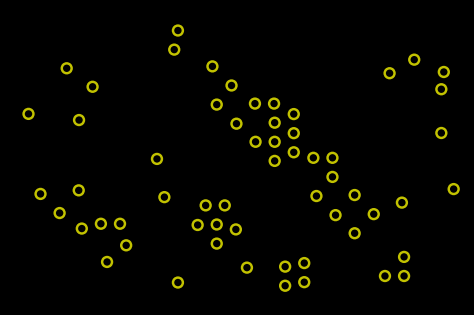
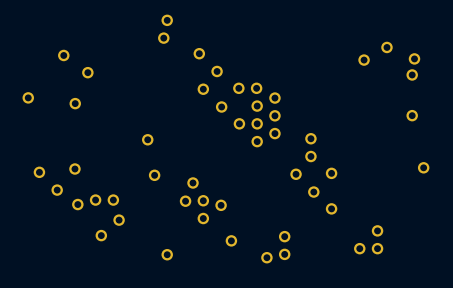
part: (313, 157) -> none
part: (401, 202) -> none
part: (224, 205) -> none
part: (373, 214) -> none
part: (285, 266) -> none

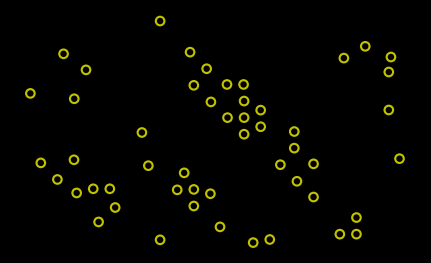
part: (163, 38) -> none
part: (274, 98) -> none
part: (284, 236) -> none

